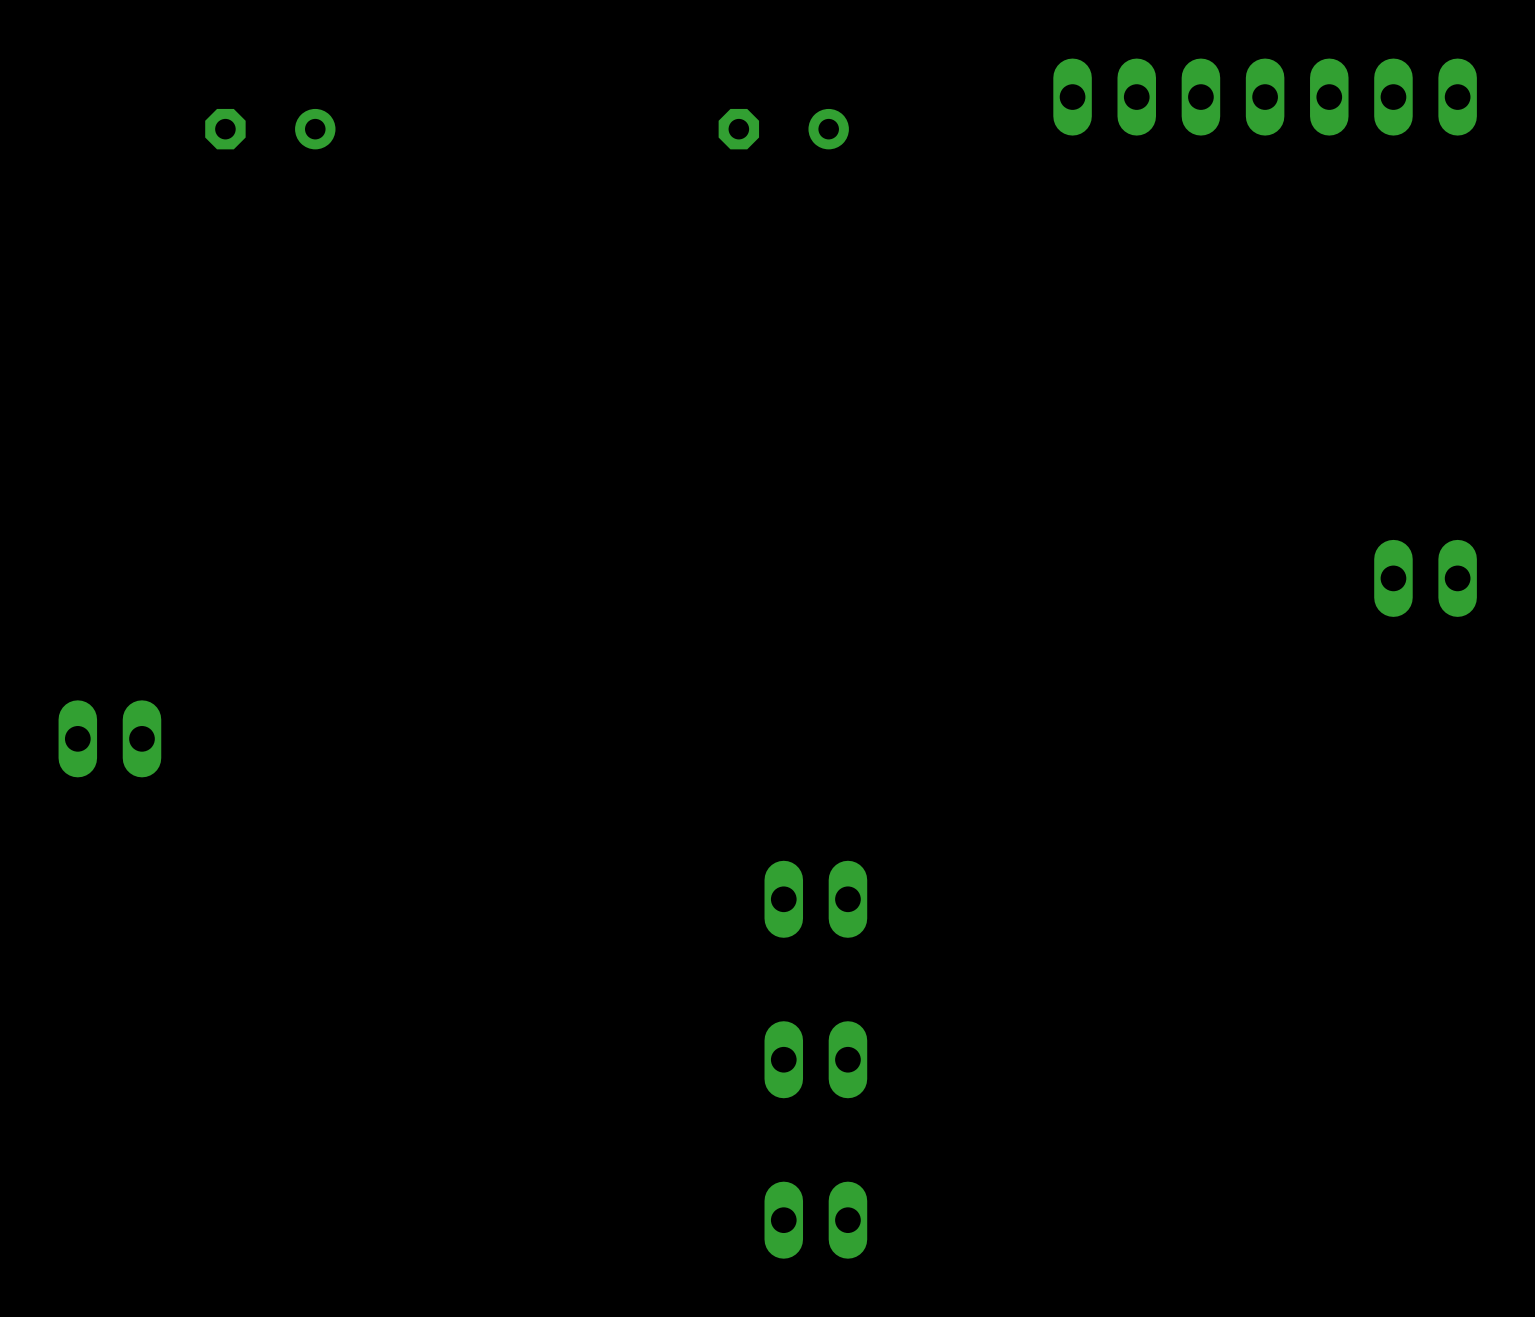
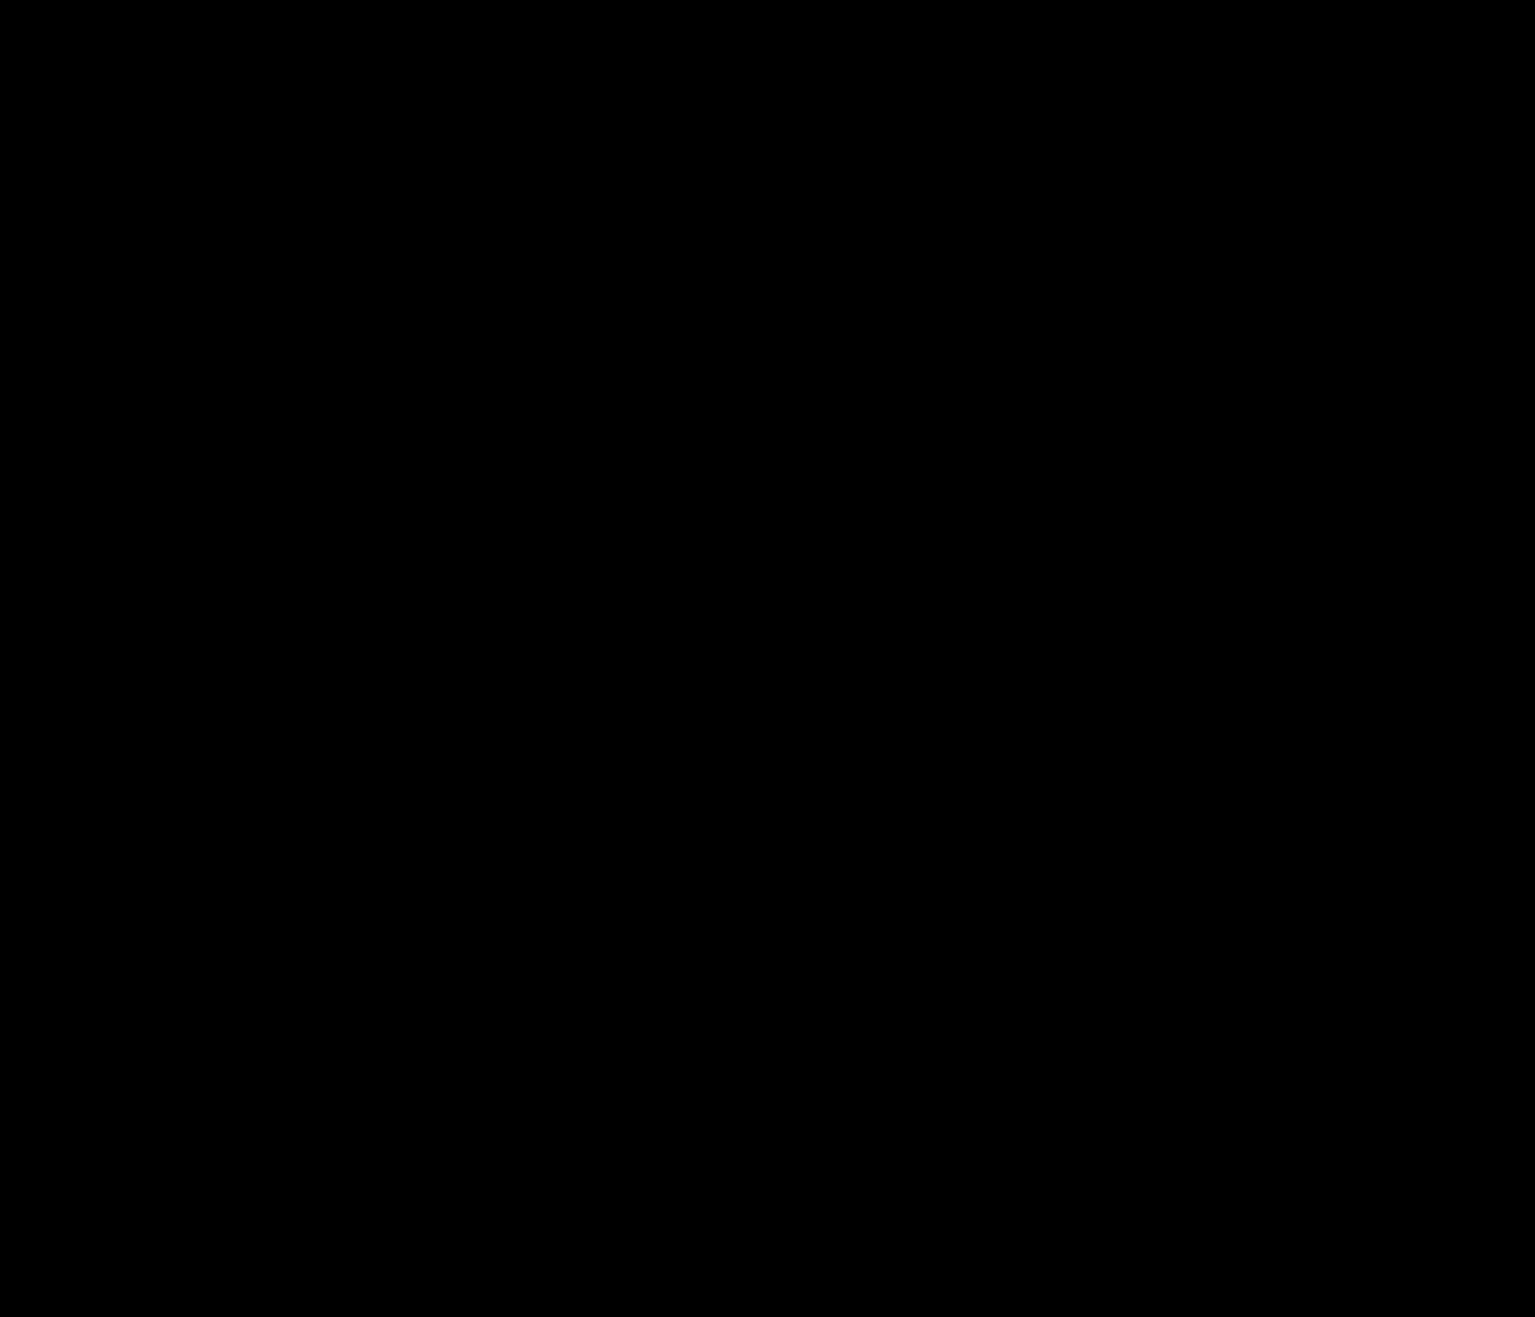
part: (1265, 97) -> none
part: (270, 129) -> none
part: (783, 129) -> none
part: (1425, 578) -> none
part: (109, 738) -> none
part: (815, 899) -> none
part: (815, 1059) -> none
part: (815, 1220) -> none

